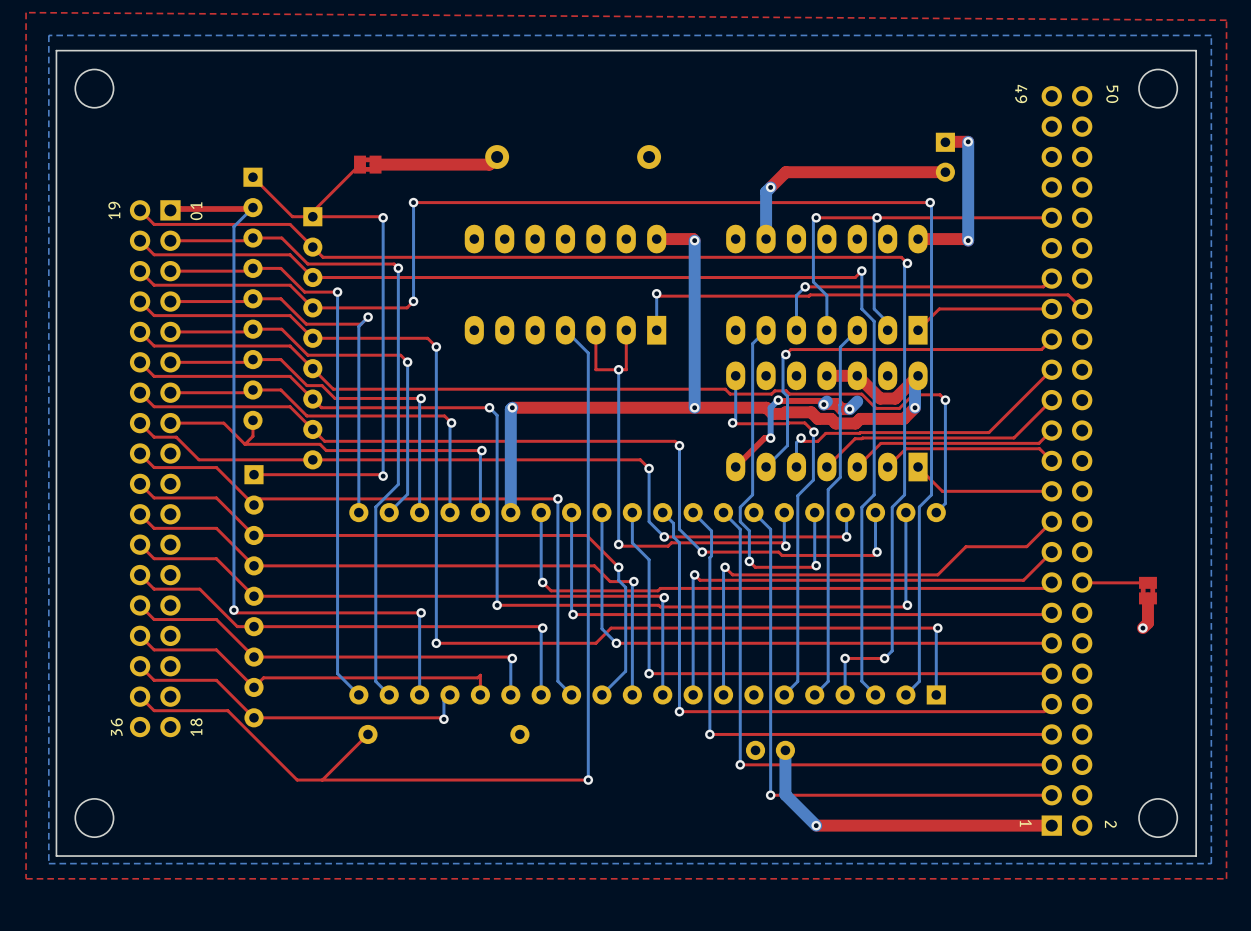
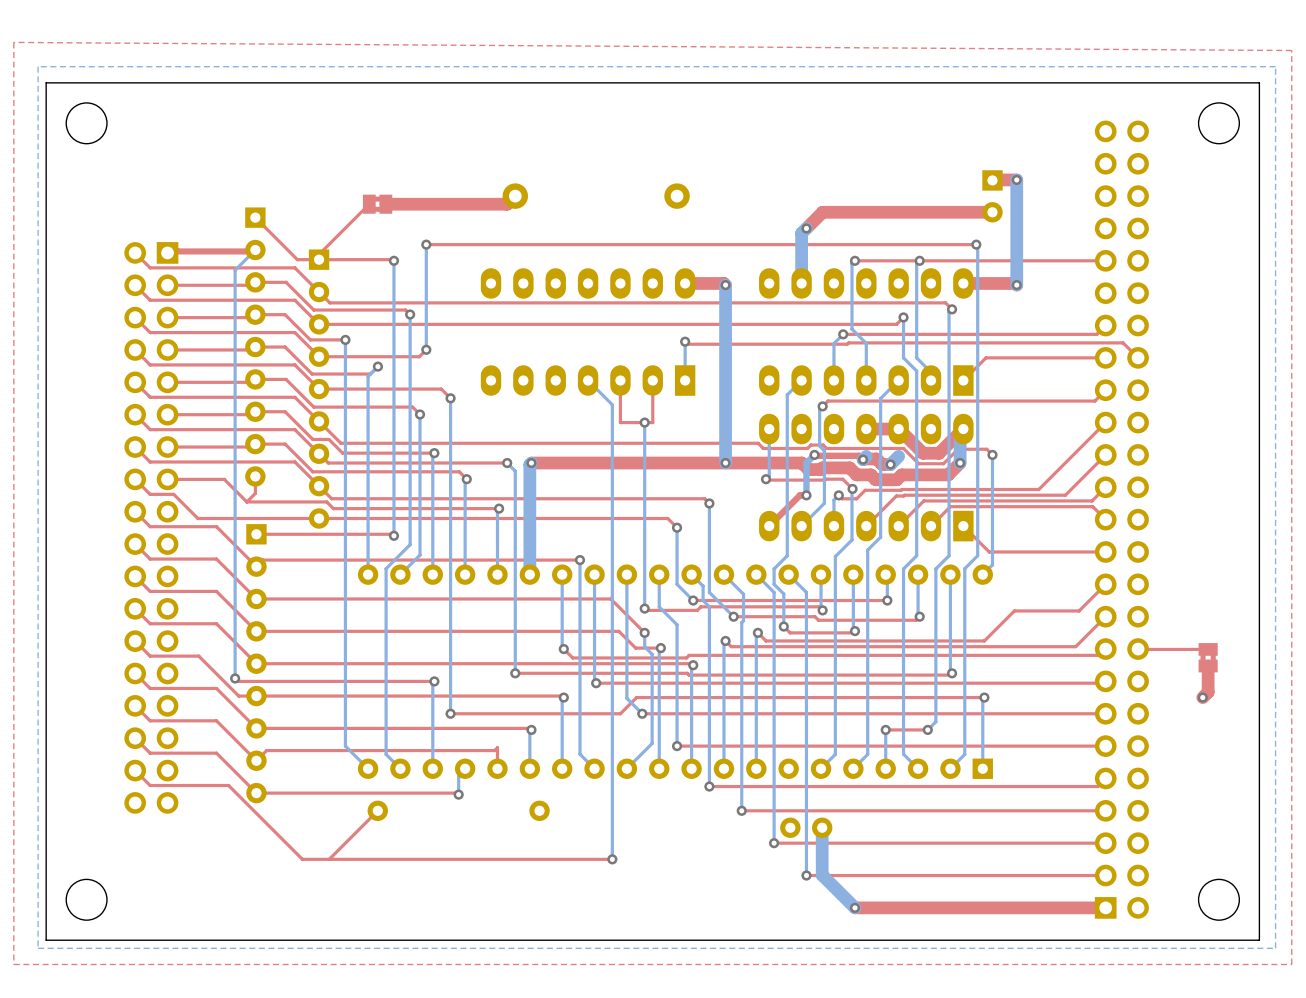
text: 49 (1021, 93) -> none
text: 50 (1112, 94) -> none
text: 19 (114, 210) -> none
text: 01 (196, 211) -> none
text: 36 (116, 727) -> none
text: 18 (196, 727) -> none
text: 1 (1025, 823) -> none
text: 2 (1110, 824) -> none

